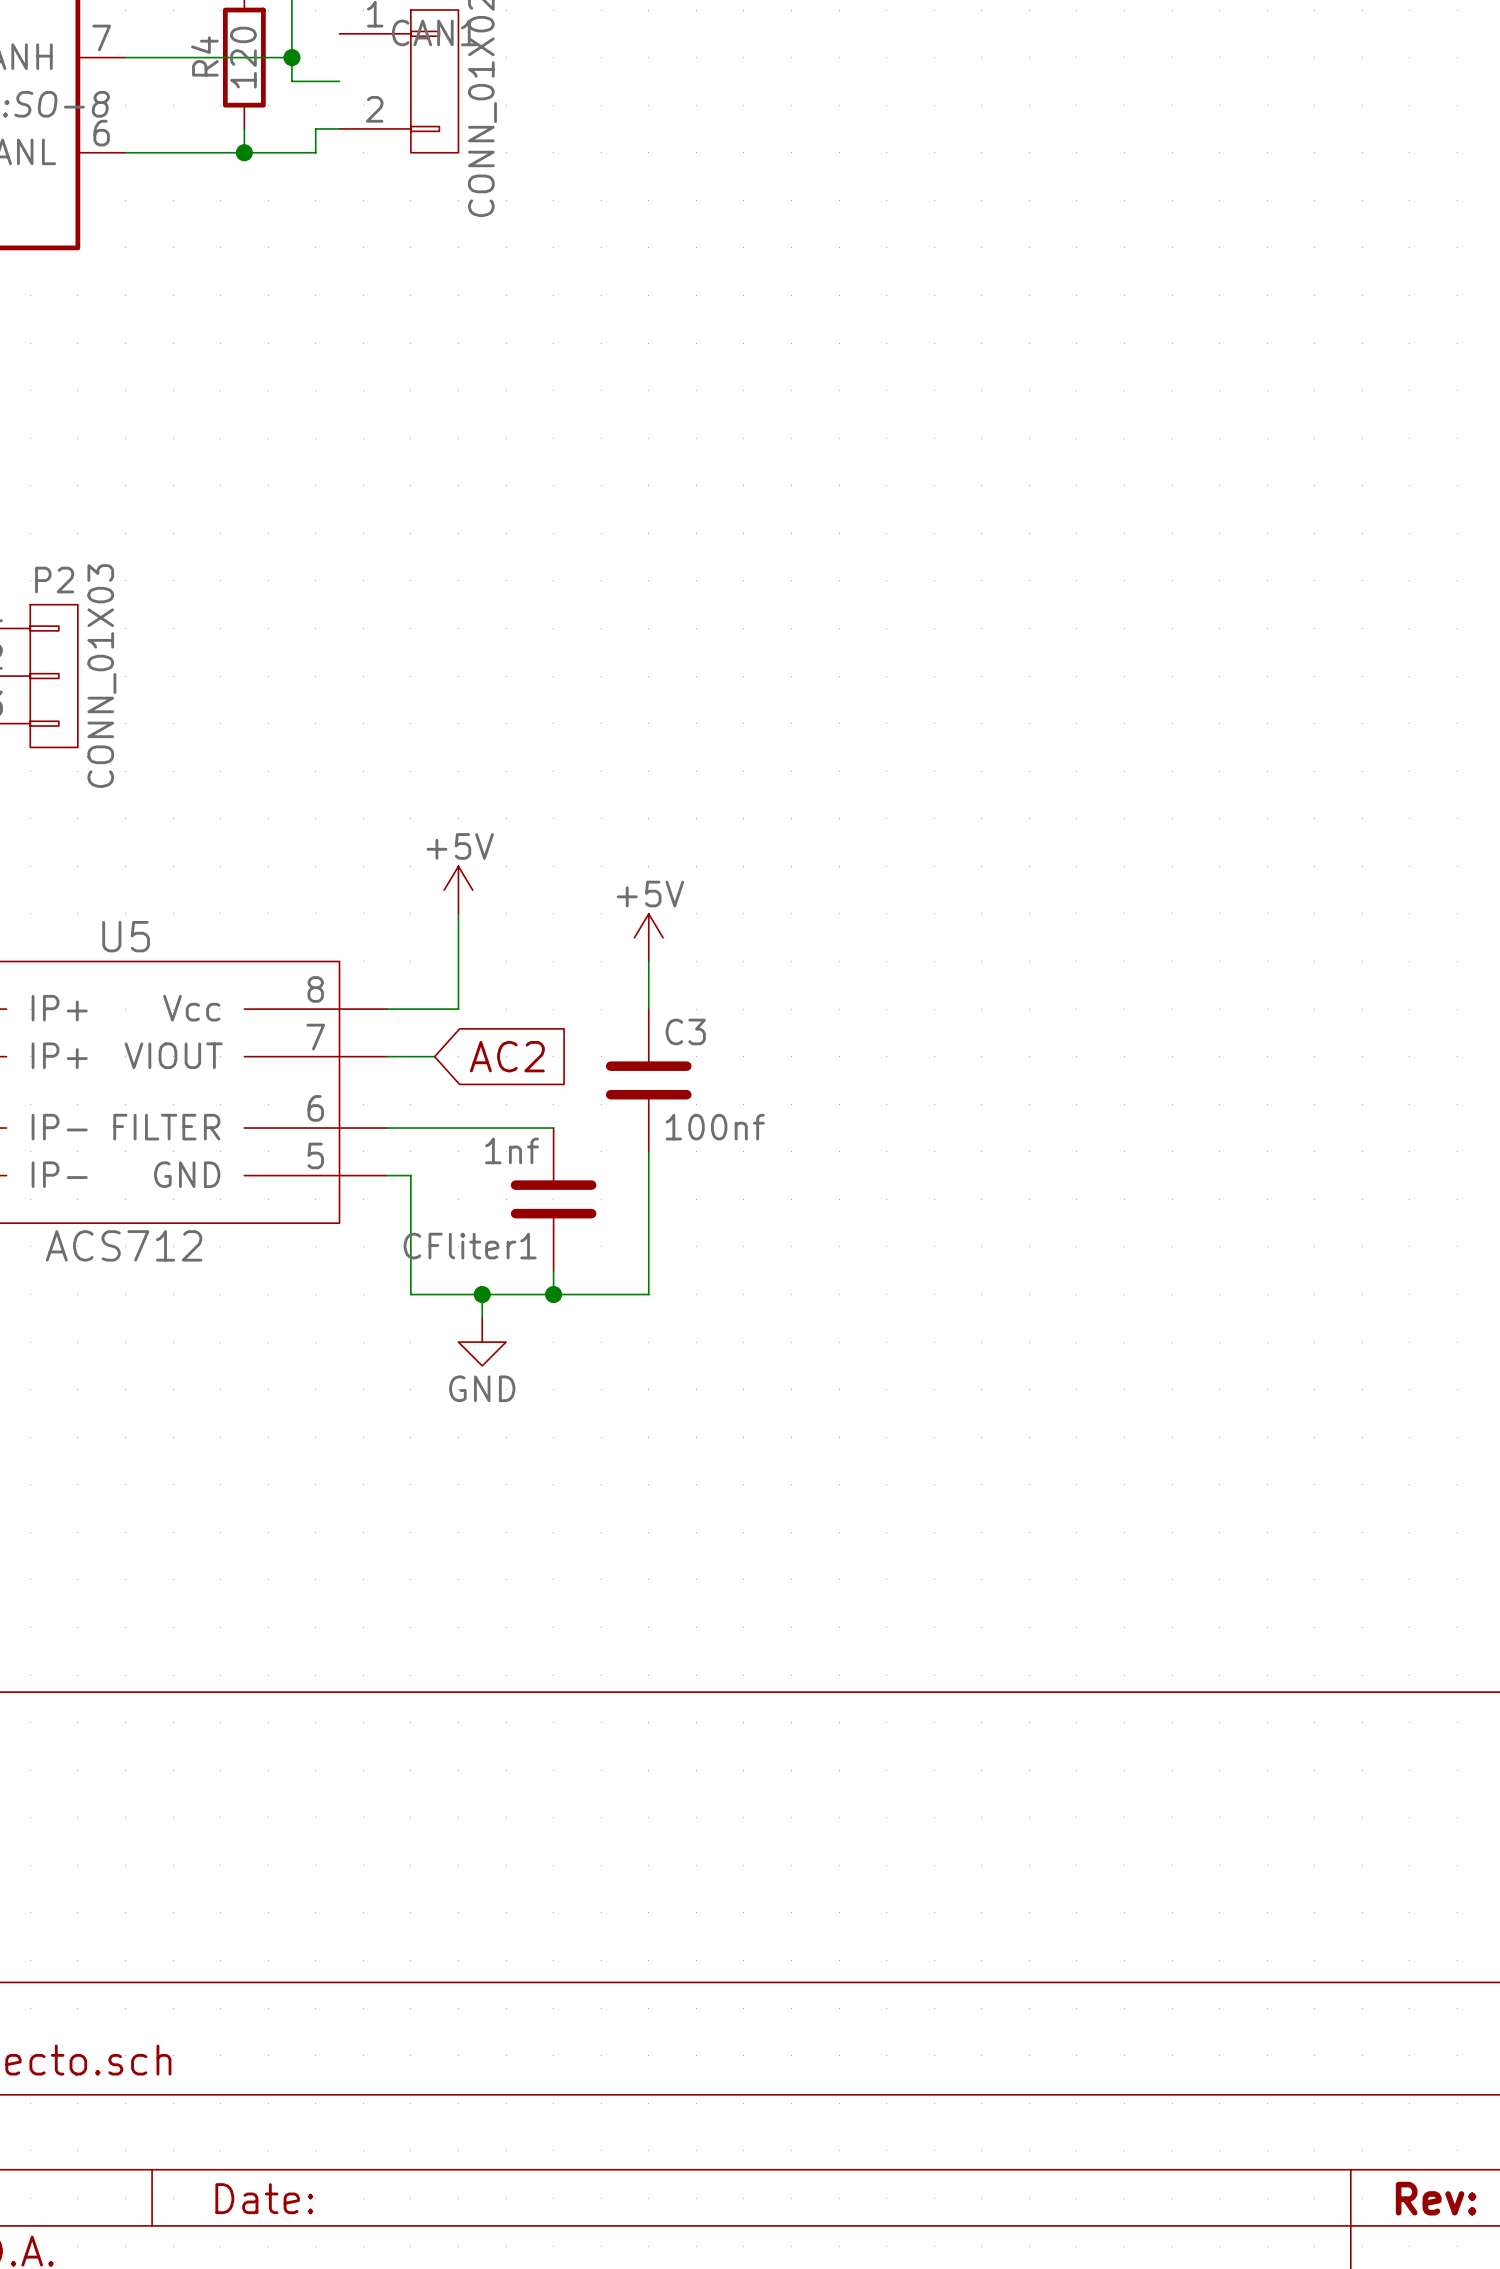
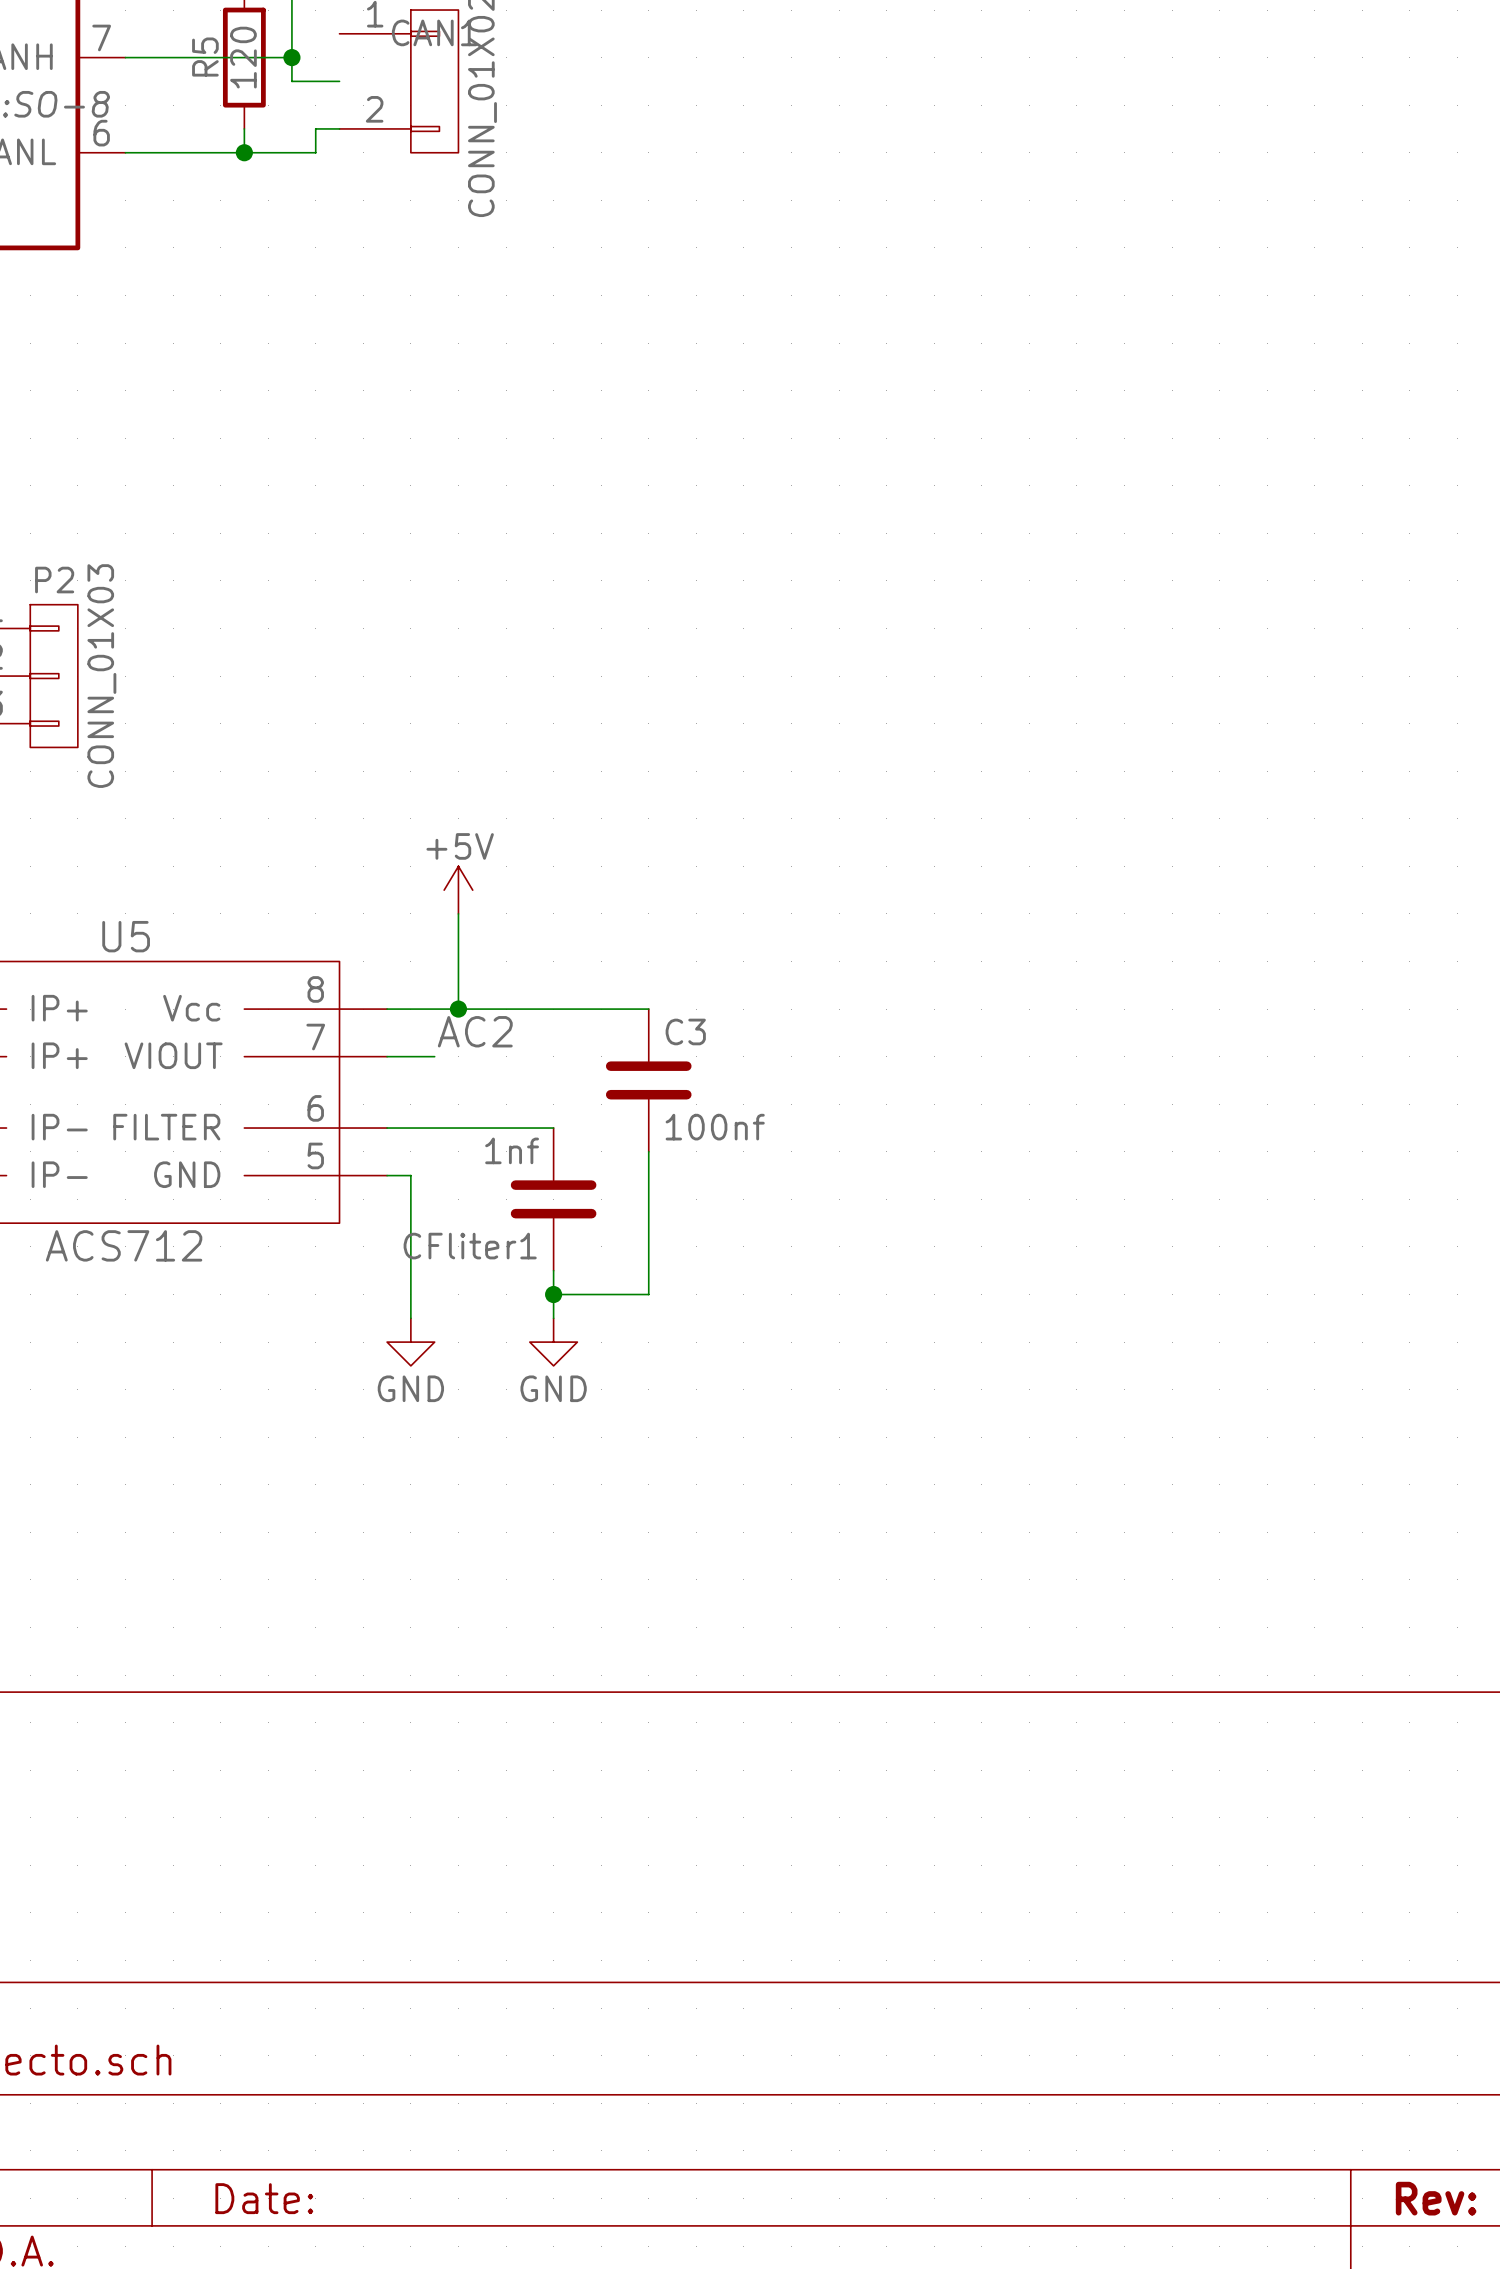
R4 name: R4 (204, 56) -> R5 (205, 57)
power symbol: +5V (648, 937) -> none
wire: (648, 961) (648, 1009) -> (458, 1009) (648, 1009)
junction: none -> (458, 1009)
label: none -> AC2 (475, 1031)
global label: AC2 (507, 1056) -> none
wire: (410, 1294) (553, 1294) -> (410, 1294) (410, 1318)
wire: (482, 1294) (482, 1318) -> (553, 1294) (553, 1318)
junction: (482, 1294) -> none
power symbol: none -> GND (410, 1342)
power symbol: GND (482, 1342) -> none
power symbol: none -> GND (553, 1342)

